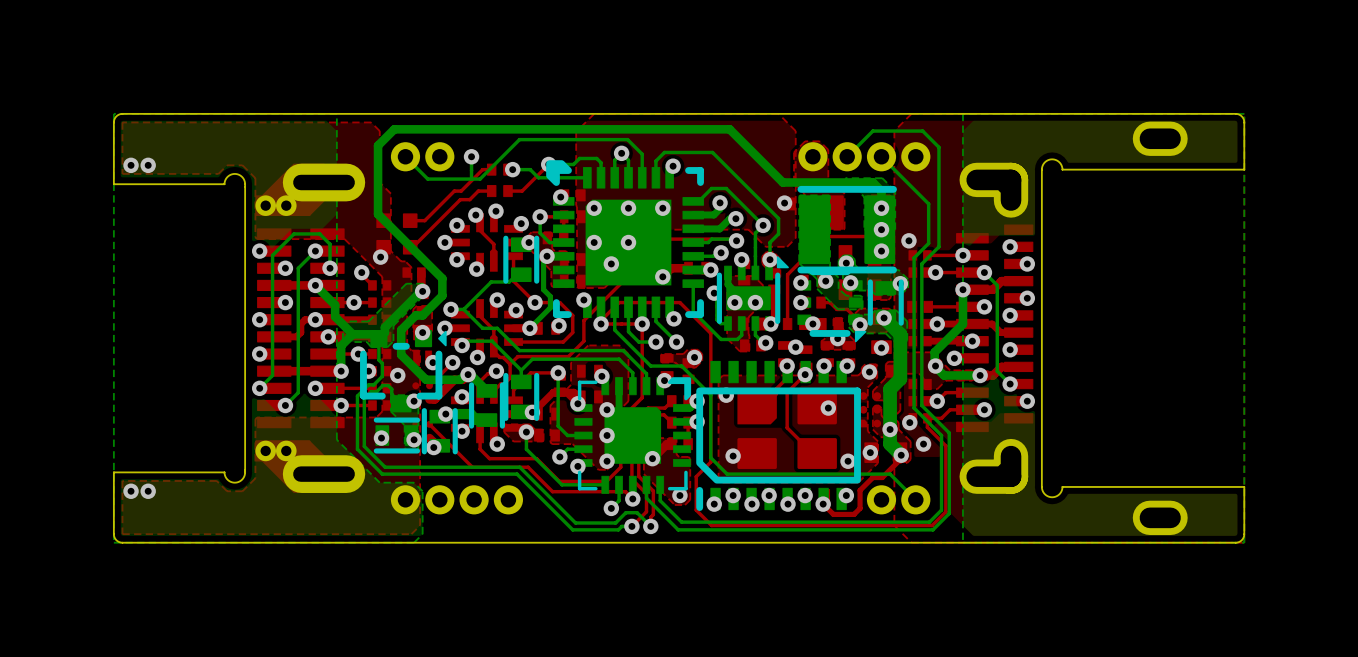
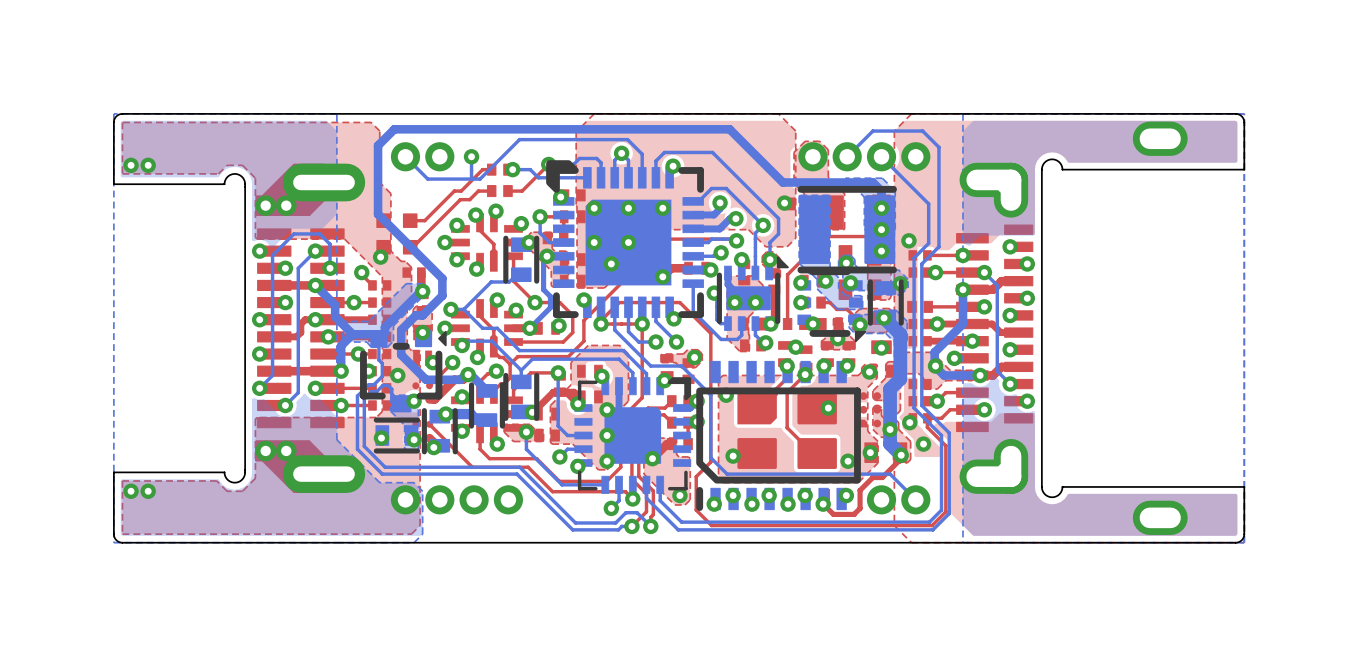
part footprint: [546, 160, 704, 319] -> [546, 160, 704, 319]

